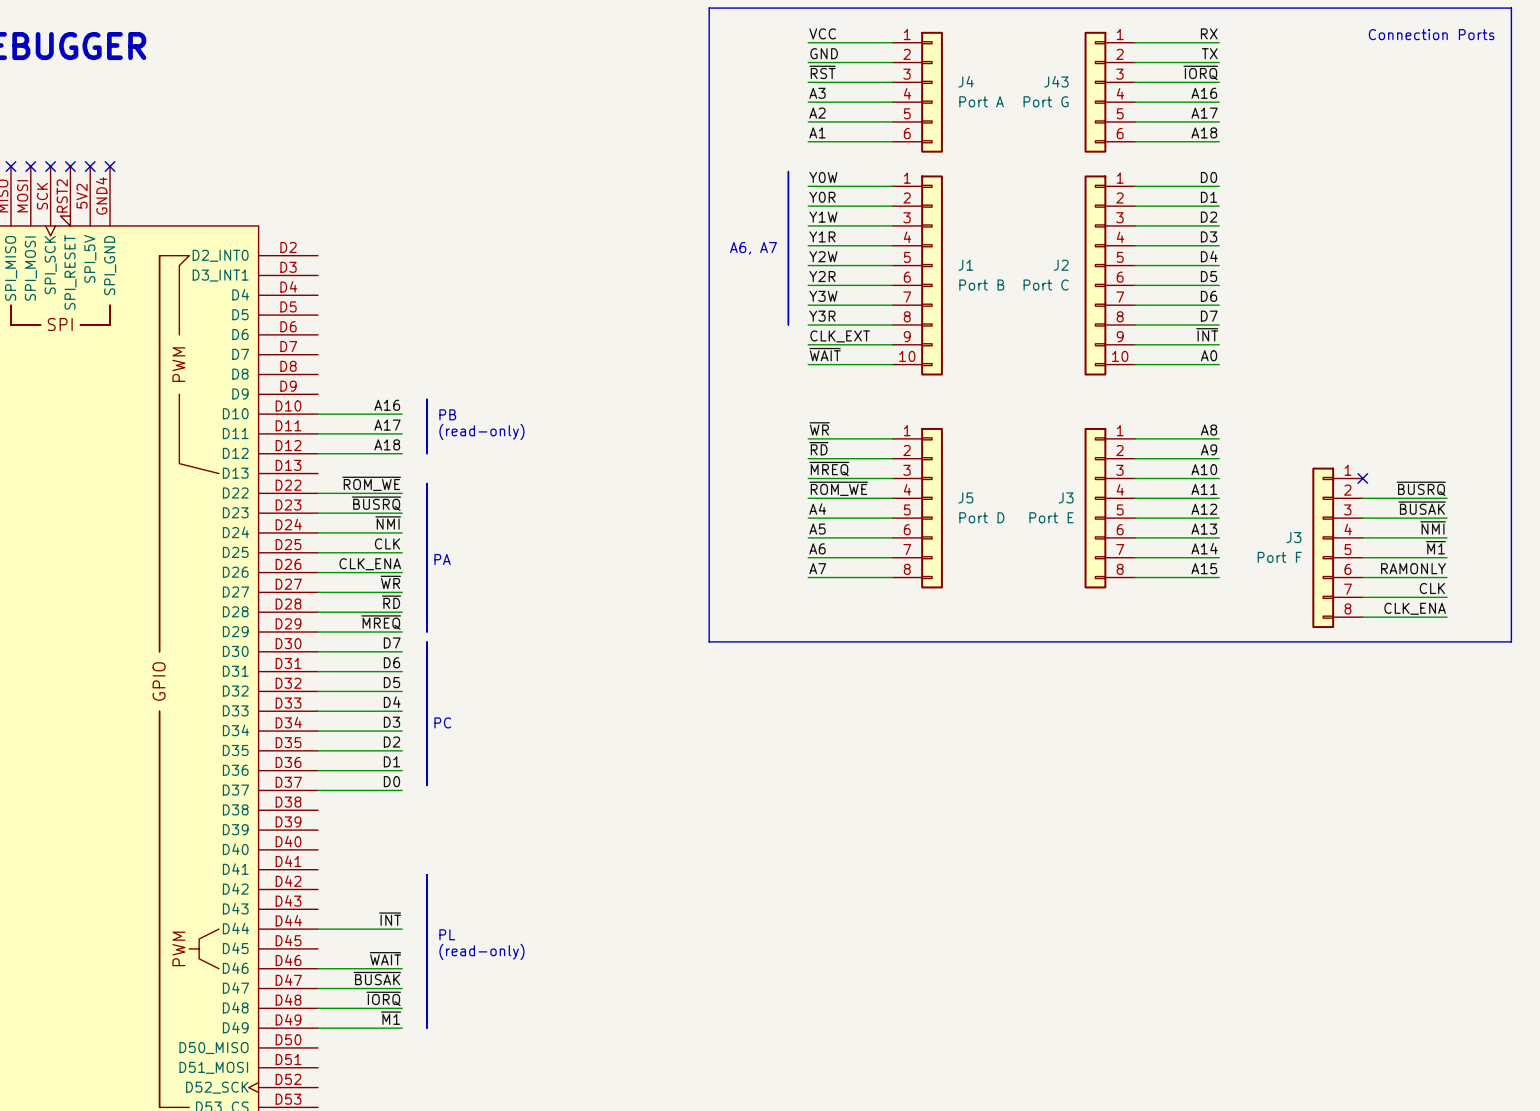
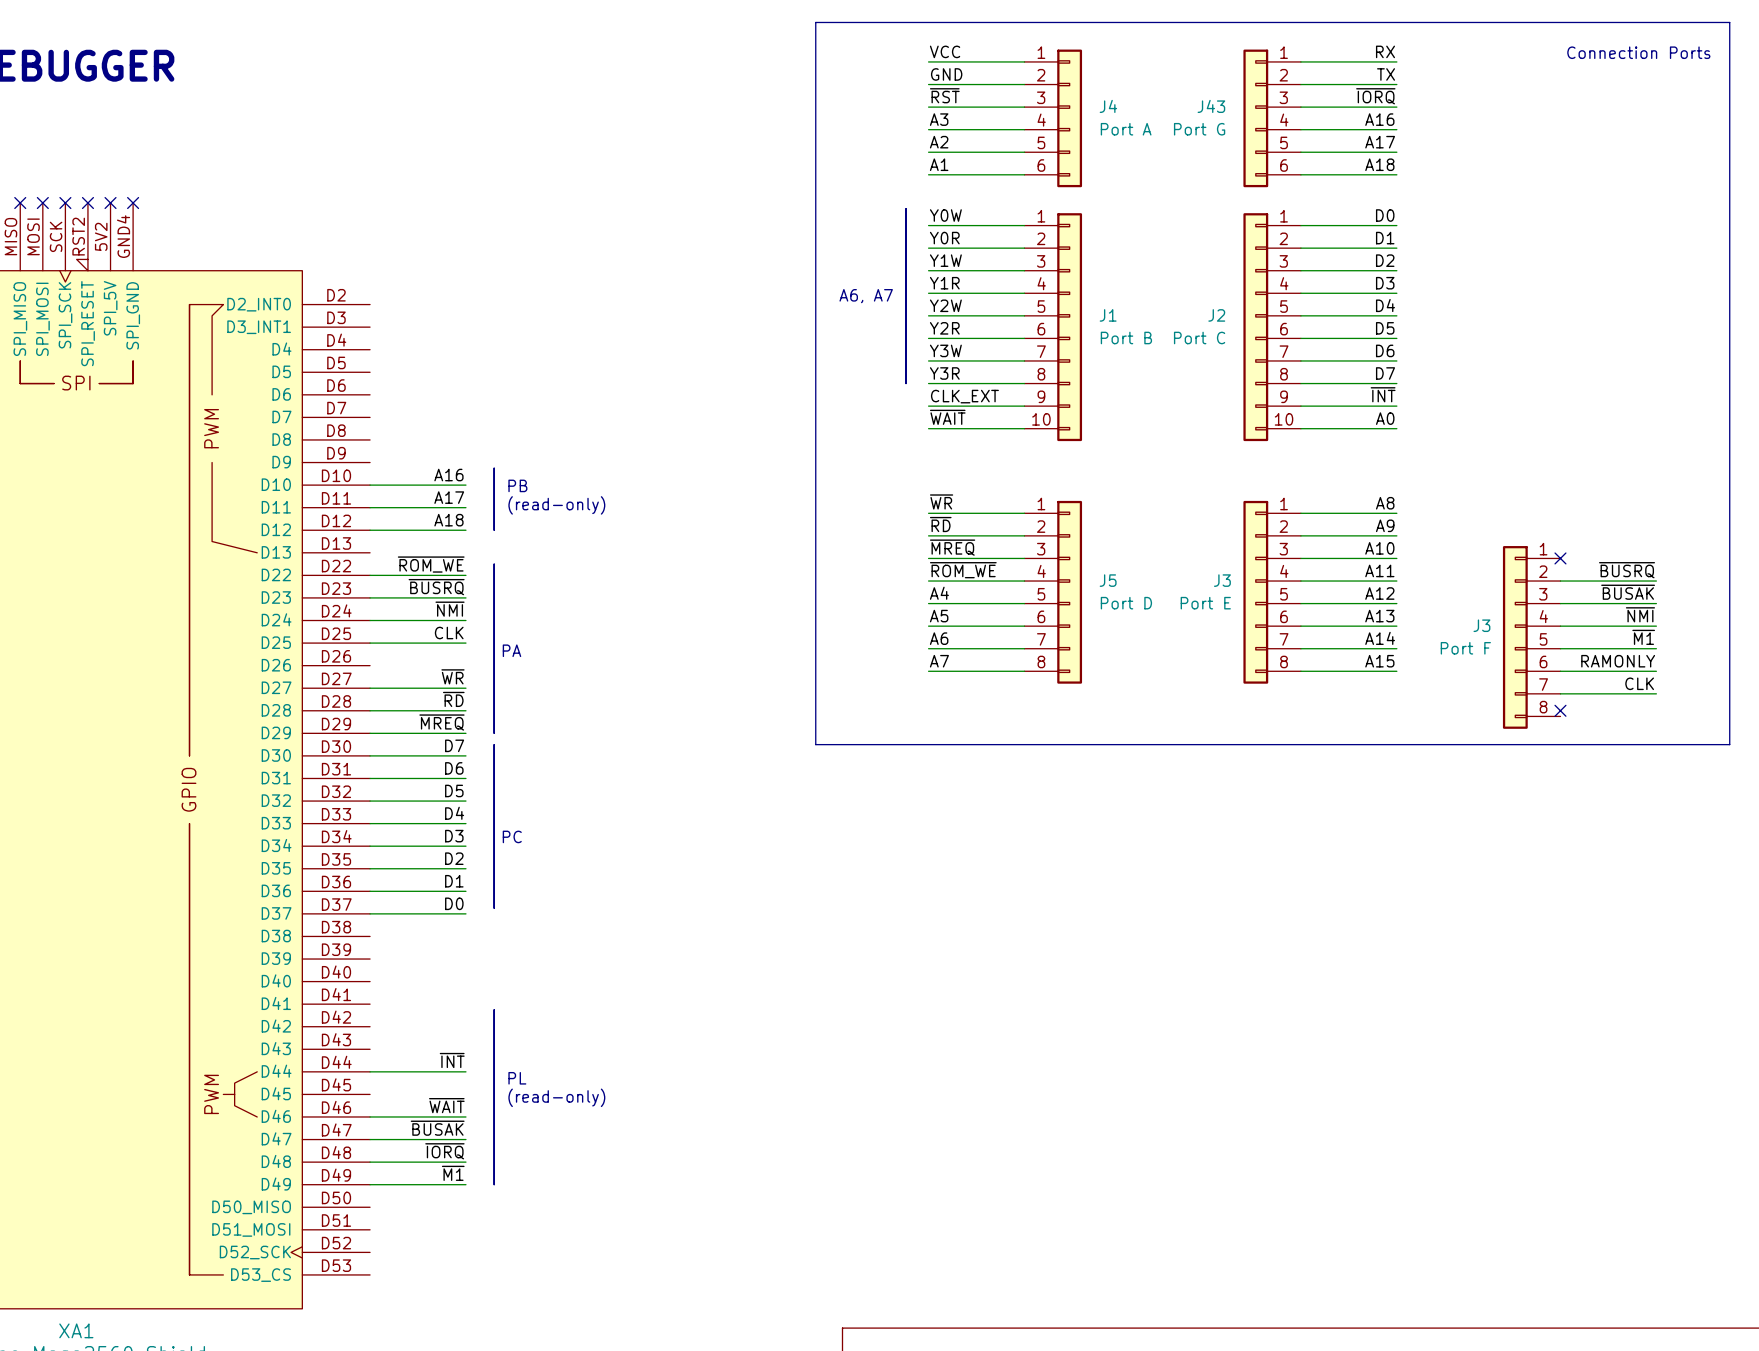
label: CLK_ENA (370, 564) -> none
wire: (318, 572) (402, 572) -> none
label: CLK_ENA (1415, 608) -> none
no-connect mark: none -> (1560, 710)
wire: (1362, 617) (1447, 617) -> none

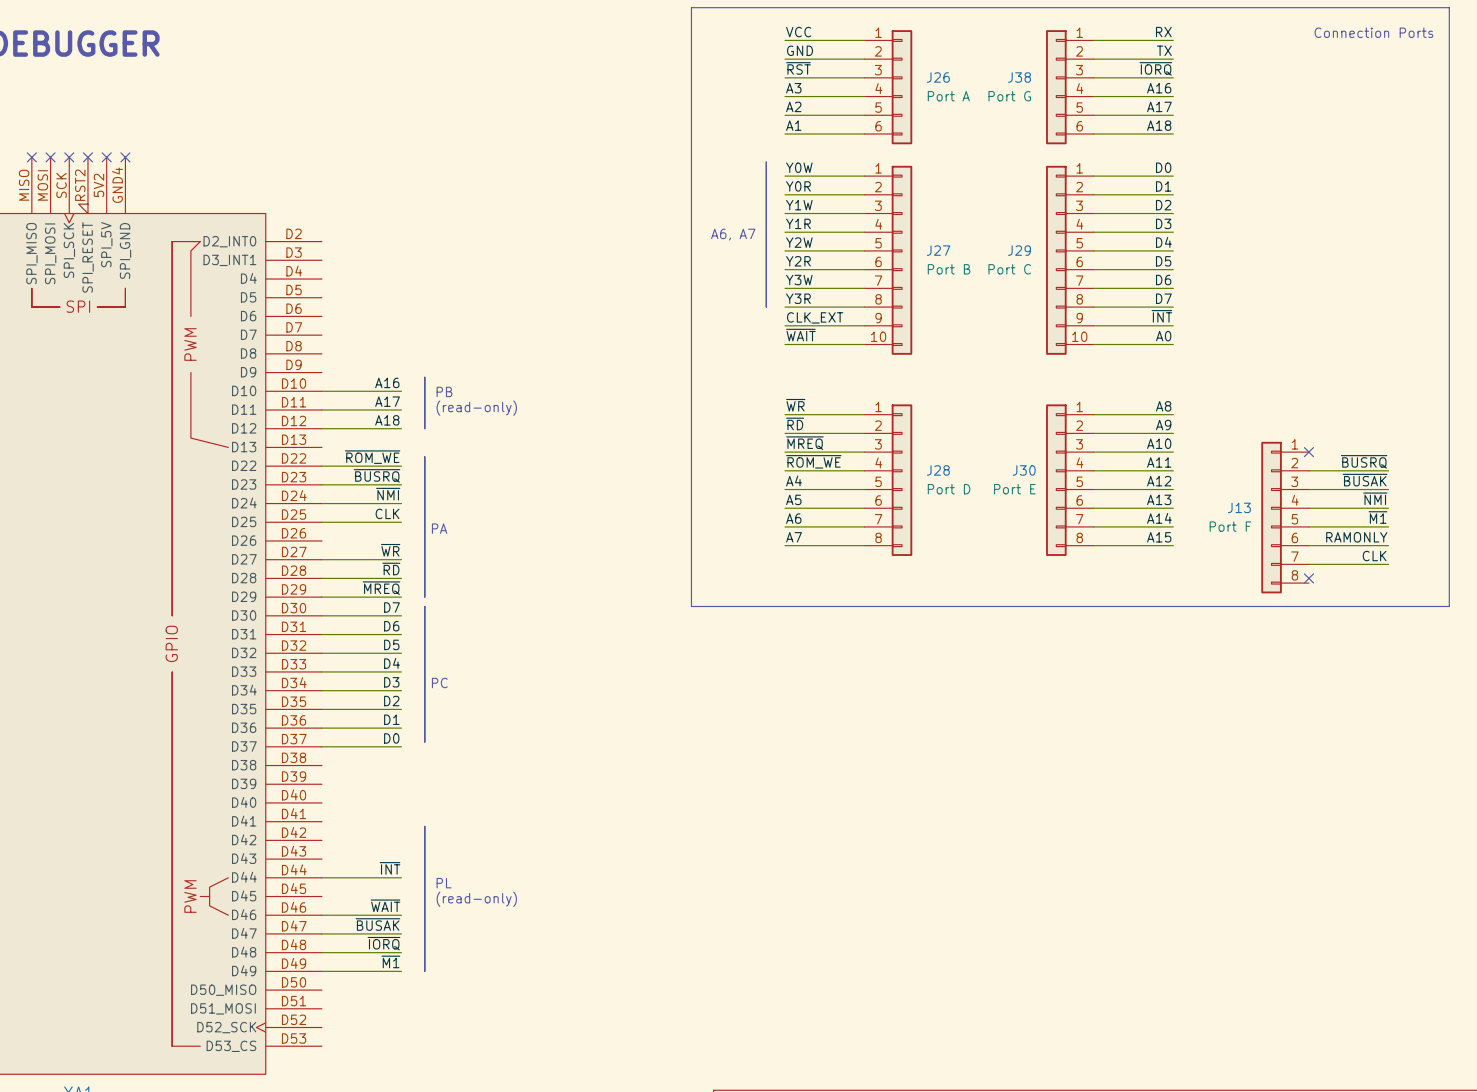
J4 name: J4 (1108, 106) -> J26 (938, 77)
J43 name: J43 (1211, 106) -> J38 (1019, 77)
J1 name: J1 (1108, 315) -> J27 (938, 250)
J2 name: J2 (1216, 315) -> J29 (1019, 250)
J5 name: J5 (1108, 580) -> J28 (938, 470)
J3 name: J3 (1222, 580) -> J30 (1024, 470)
J3 name: J3 (1481, 625) -> J13 (1239, 507)

